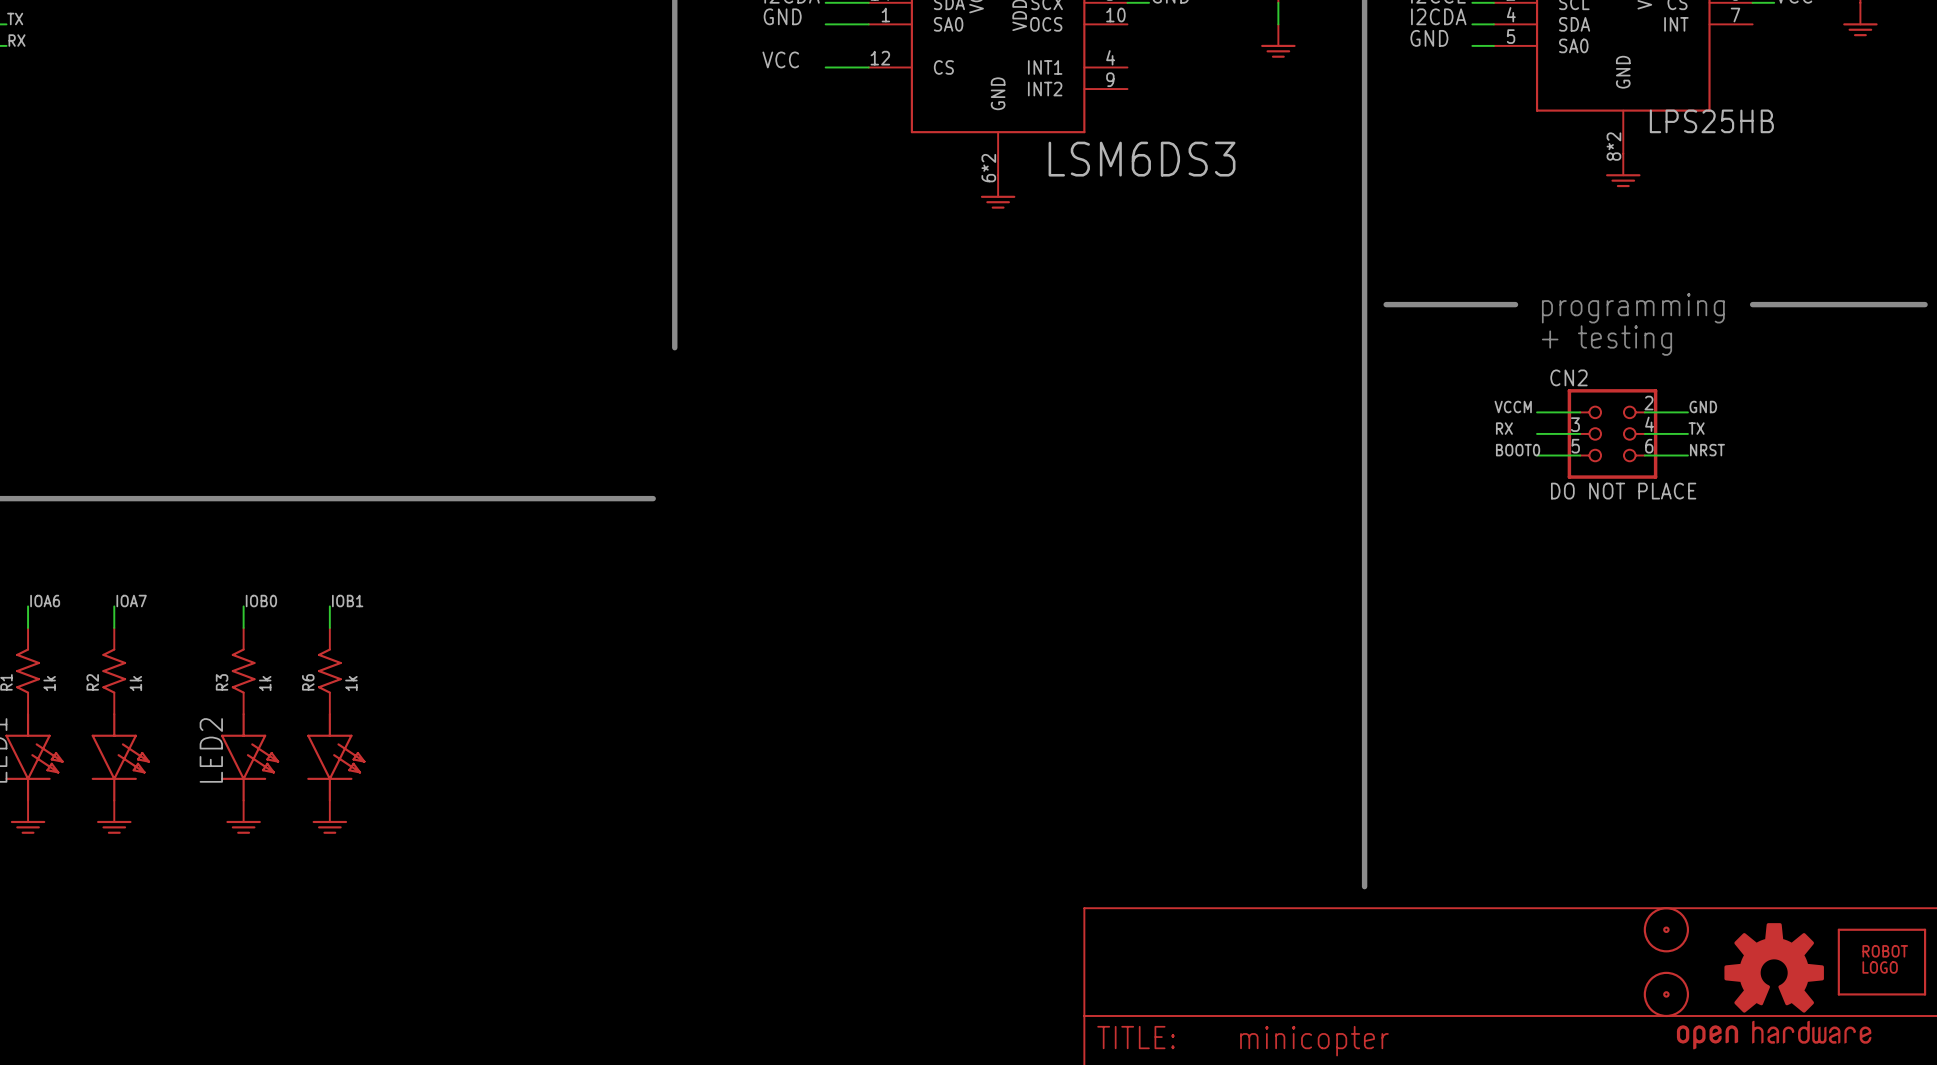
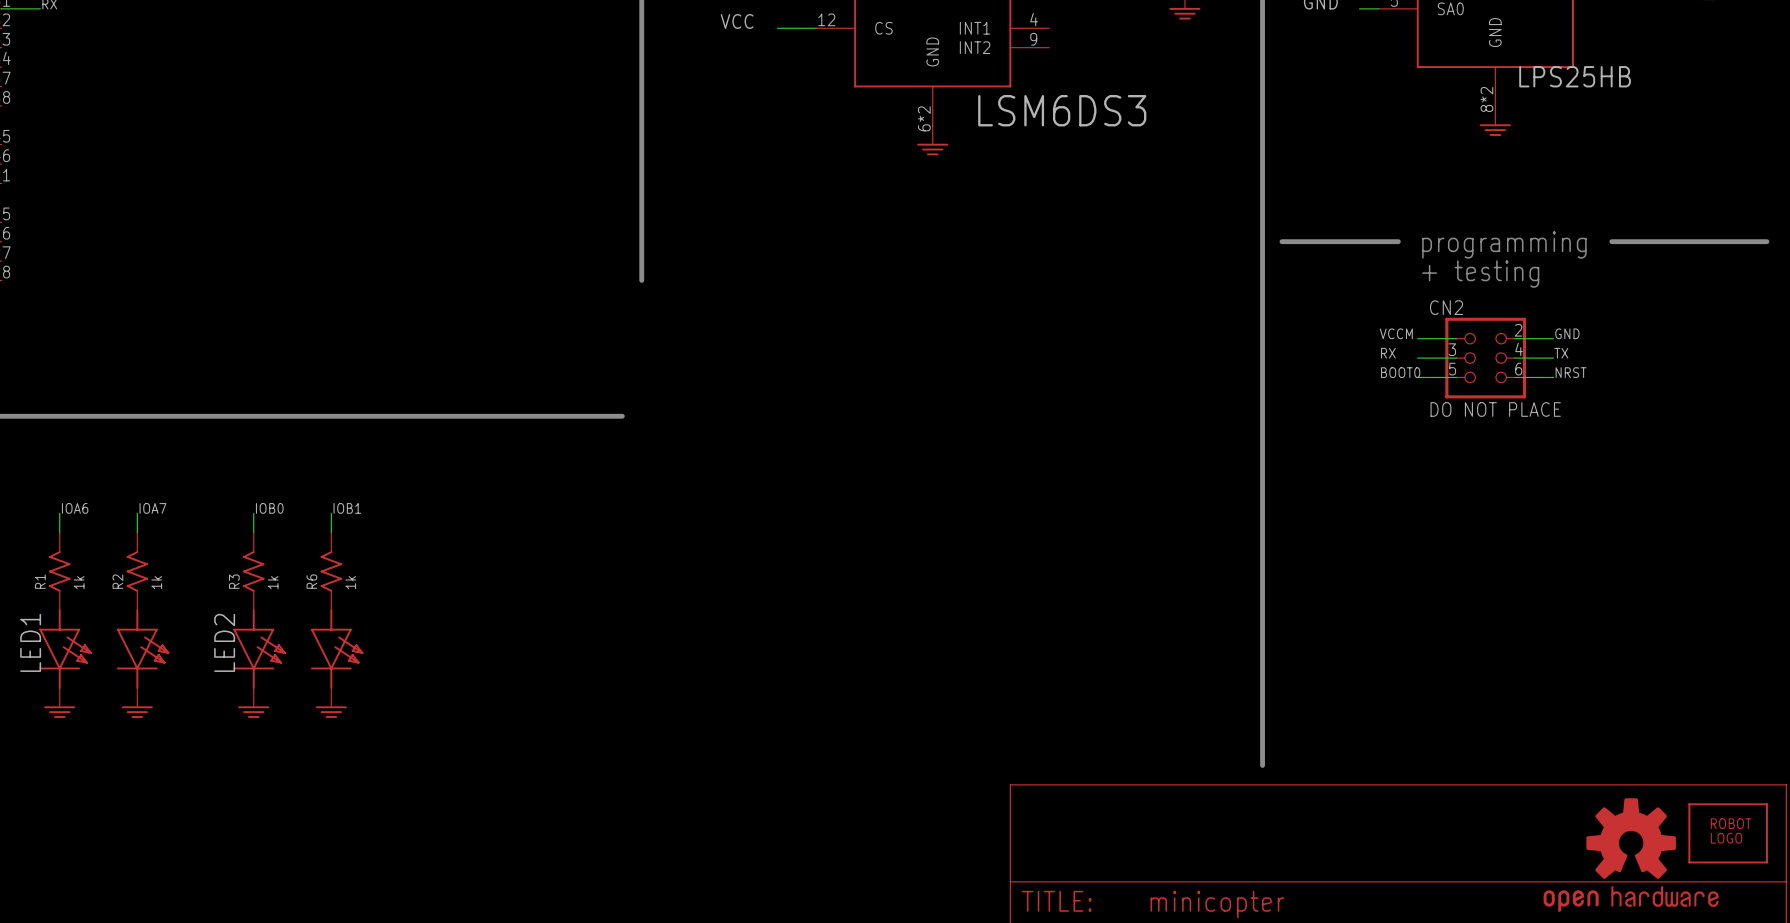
part: (1666, 929) -> none
part: (1666, 994) -> none

